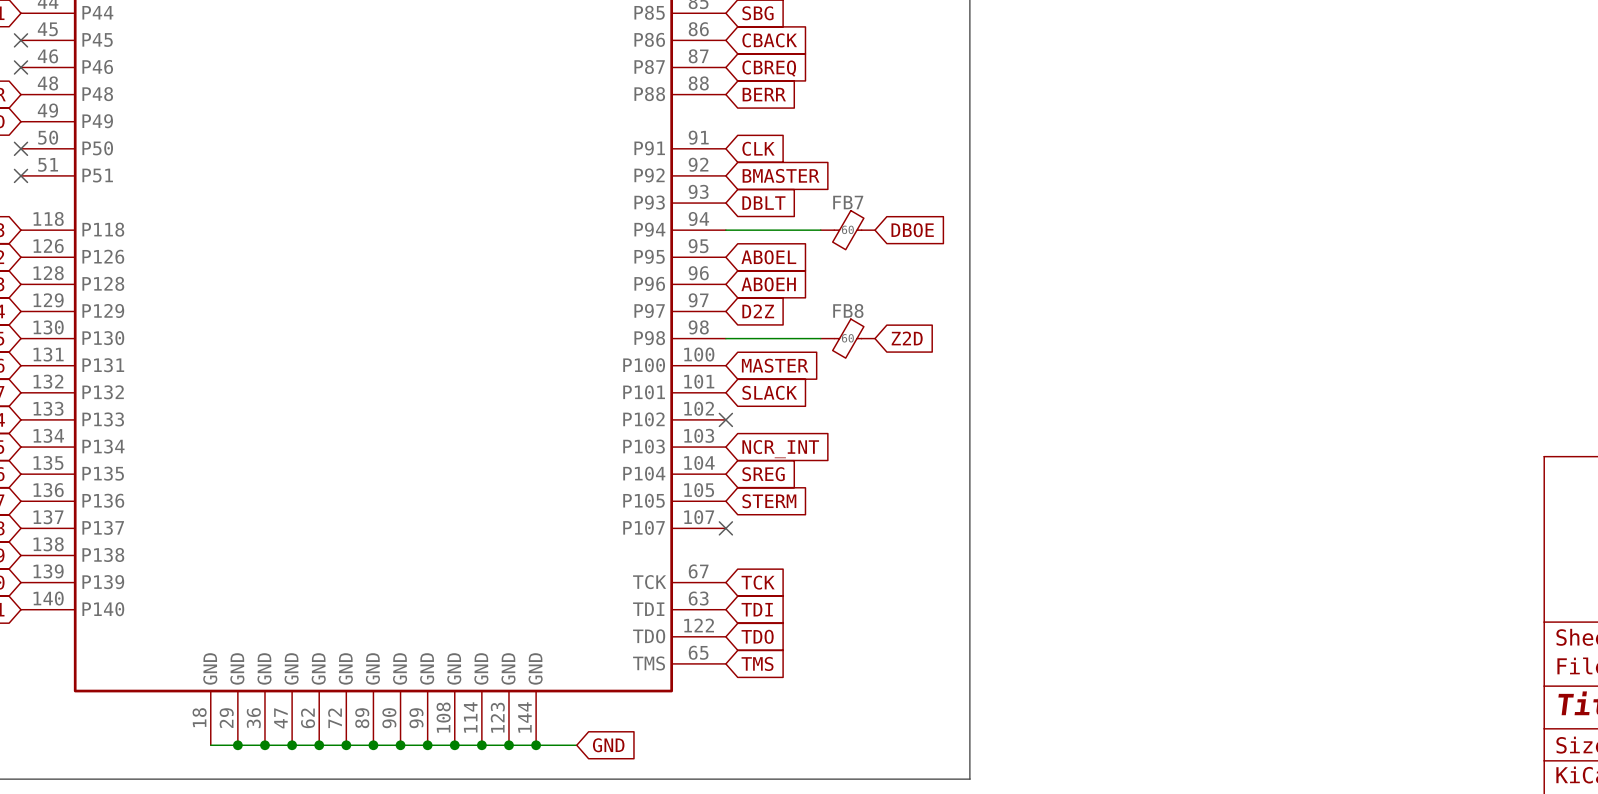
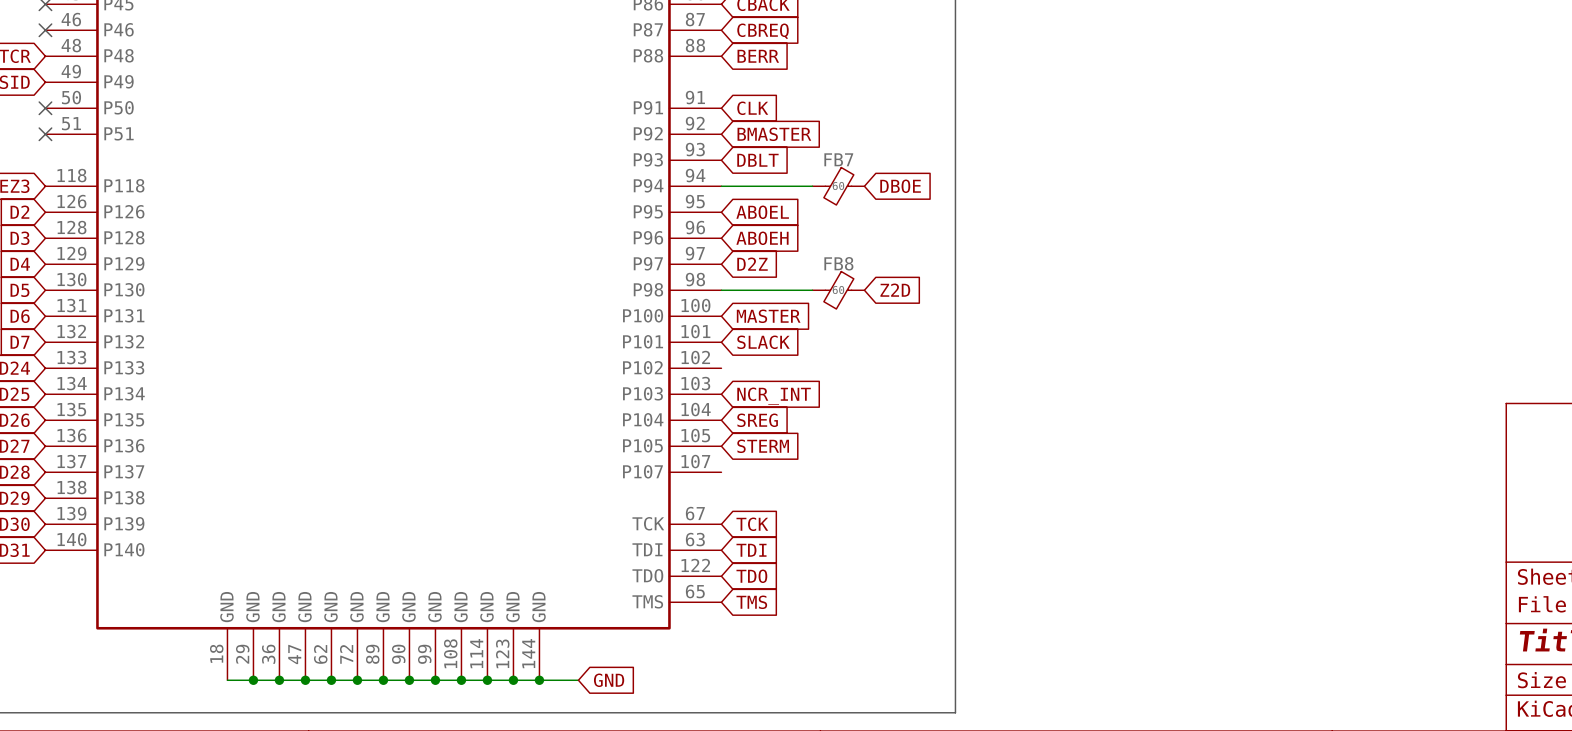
no-connect mark: (725, 419) -> none
no-connect mark: (725, 528) -> none

